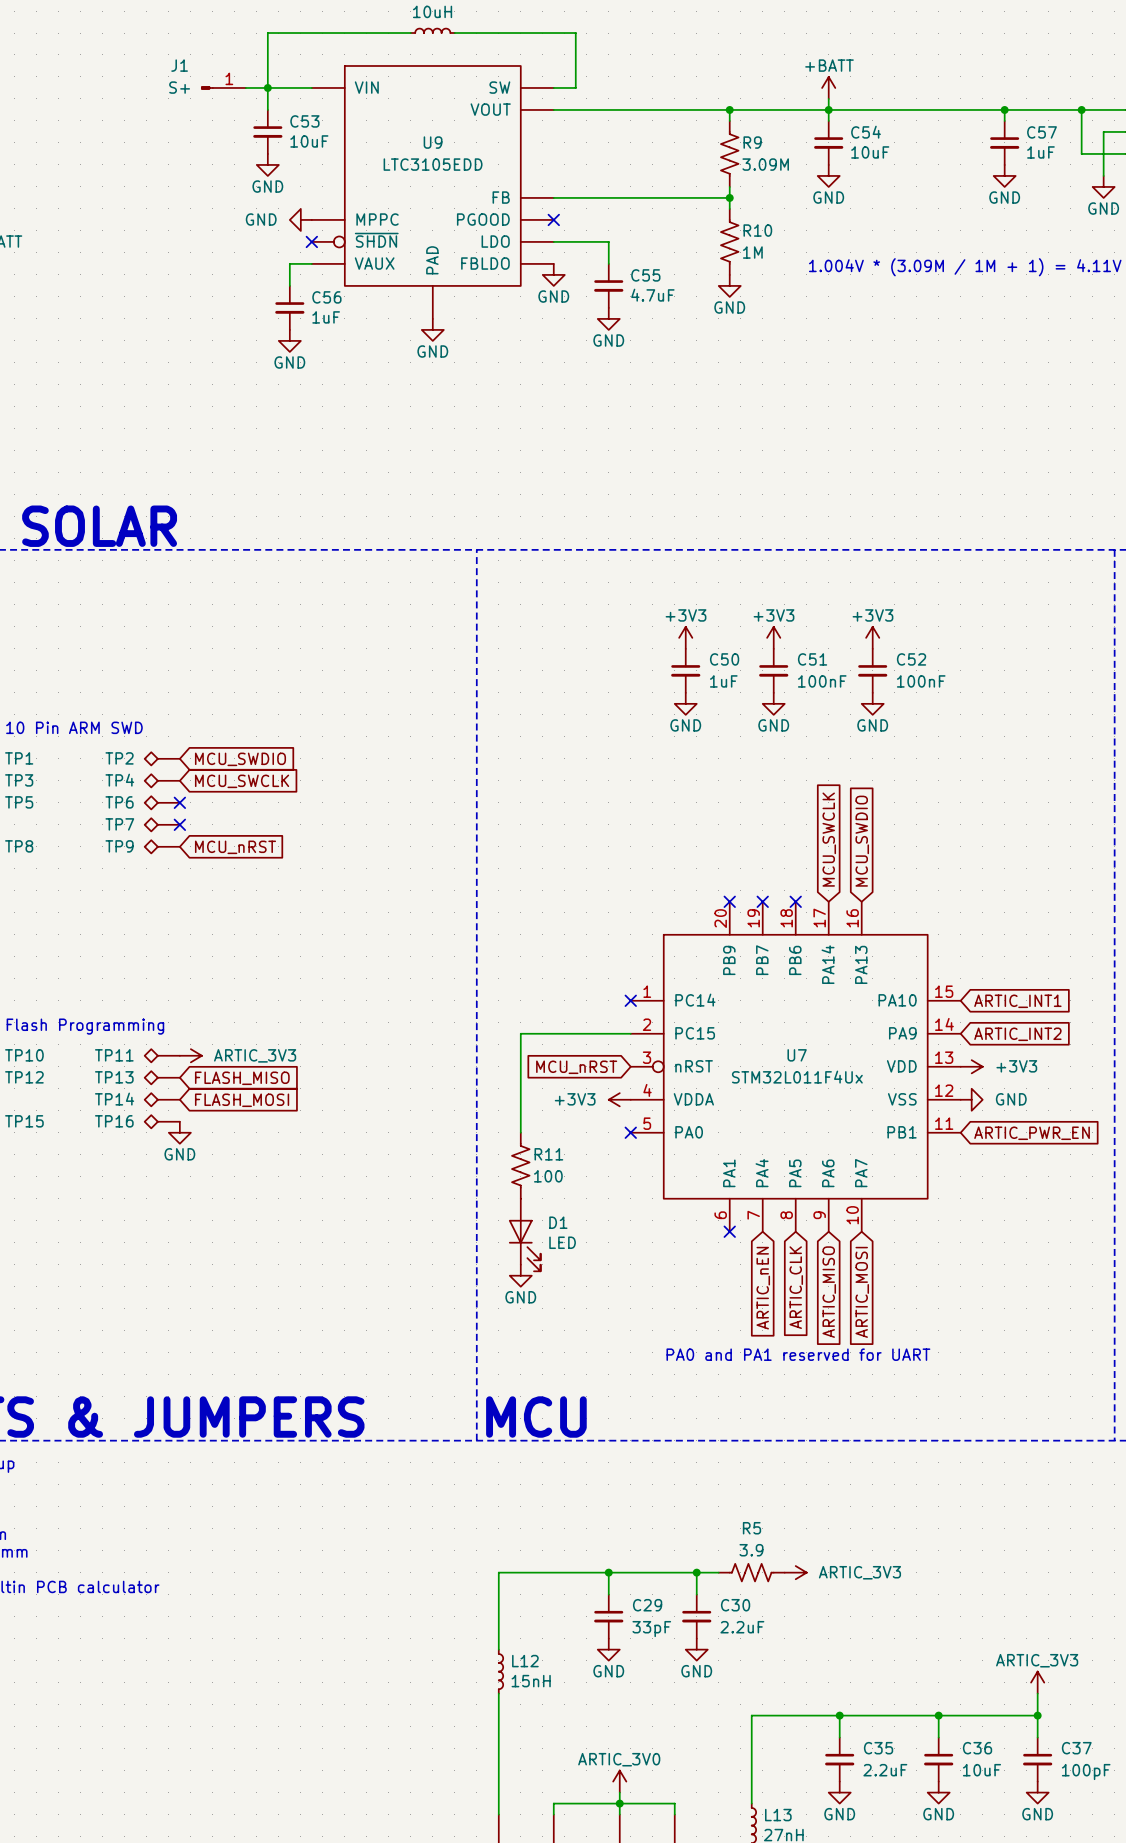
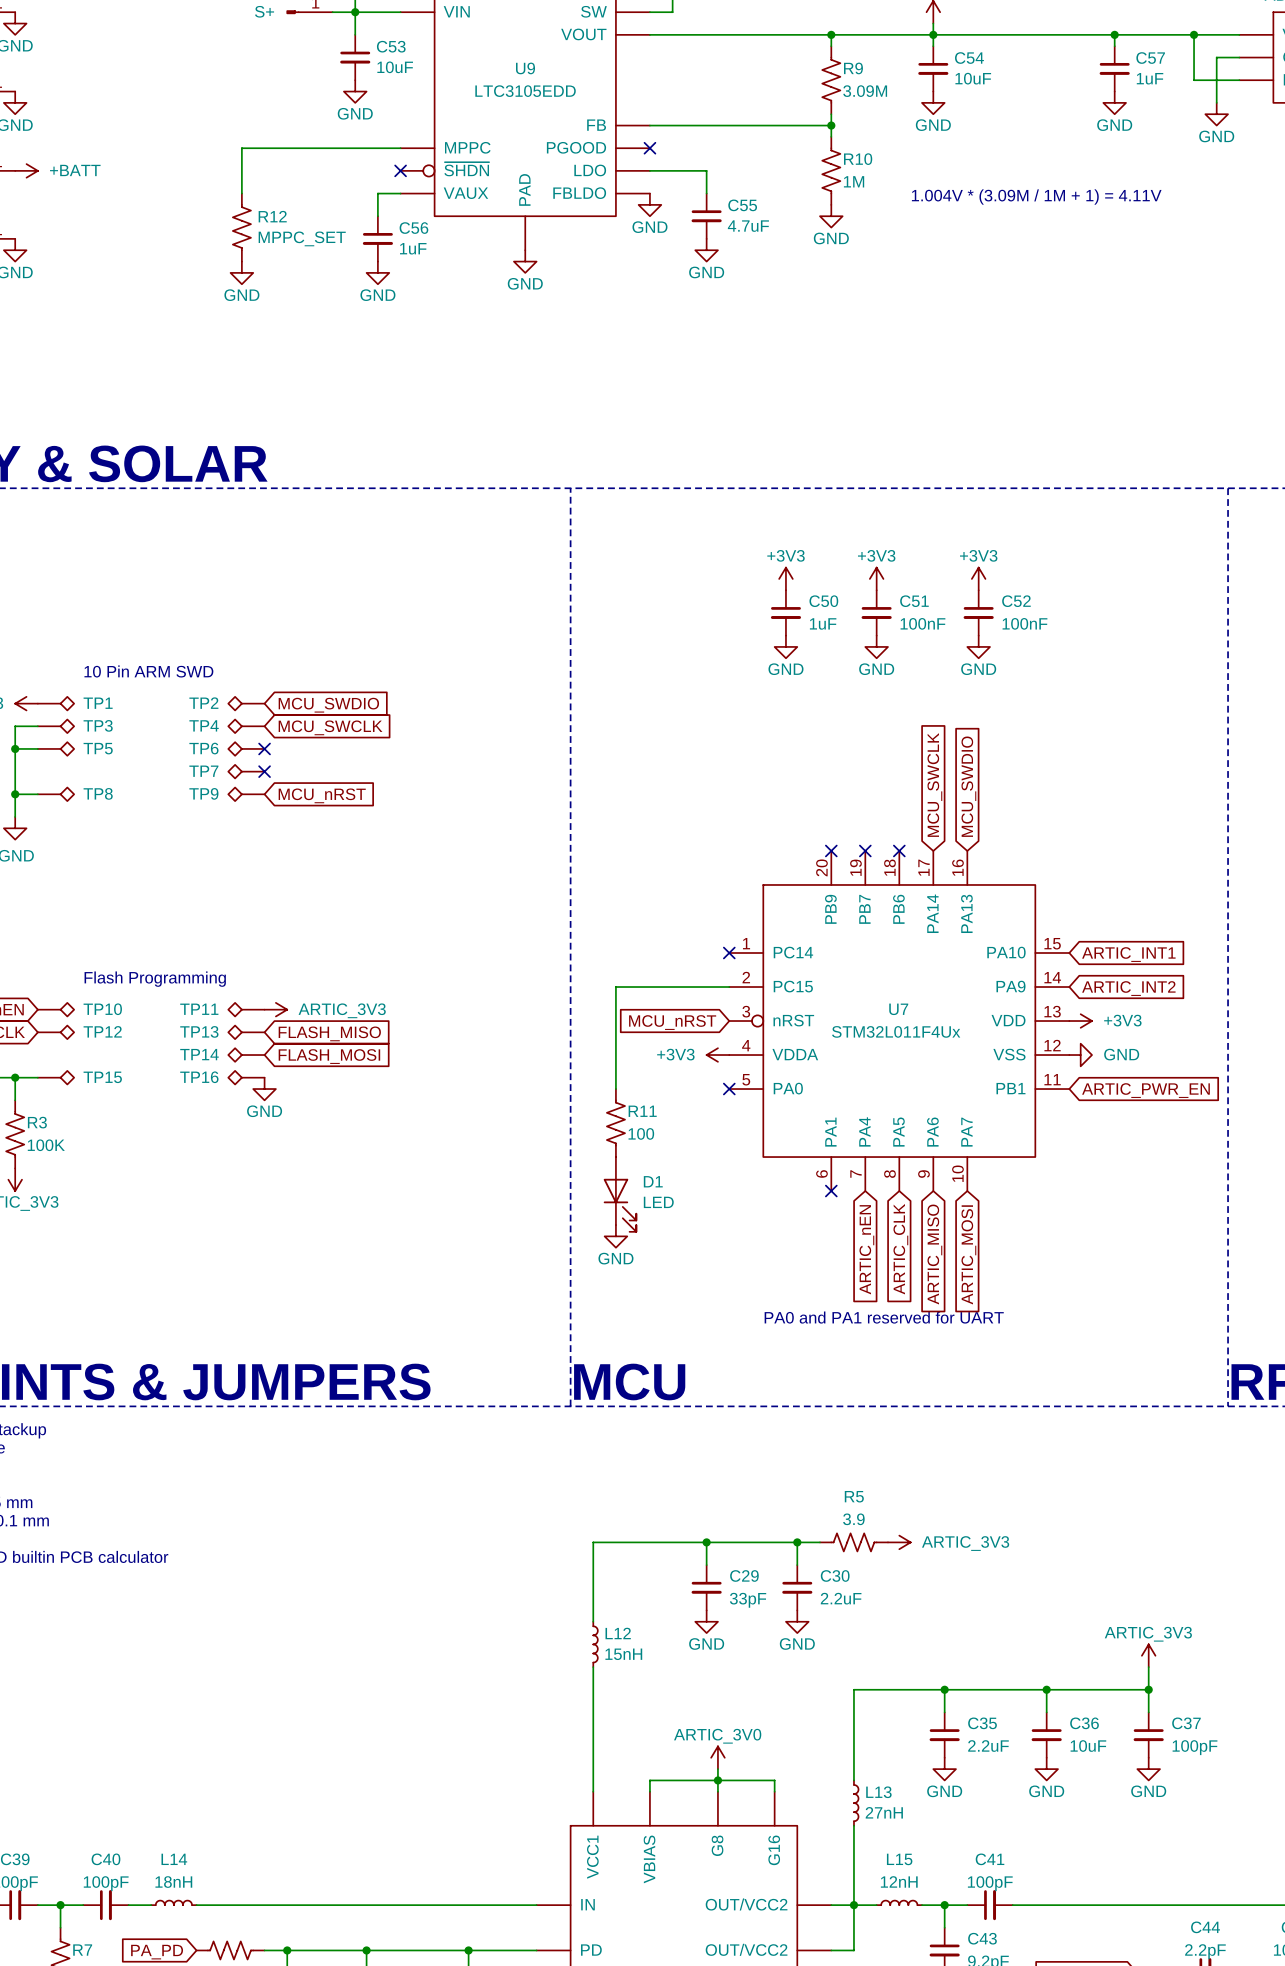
power symbol text position: GND (261, 219) -> GND (241, 295)
power symbol rotation: 0° (300, 219) -> 90° counterclockwise (241, 272)
power symbol position: GND (300, 219) -> GND (241, 272)
wire: none -> (400, 148) (241, 148) (241, 193)
R12: none -> MPPC_SET (241, 227)

